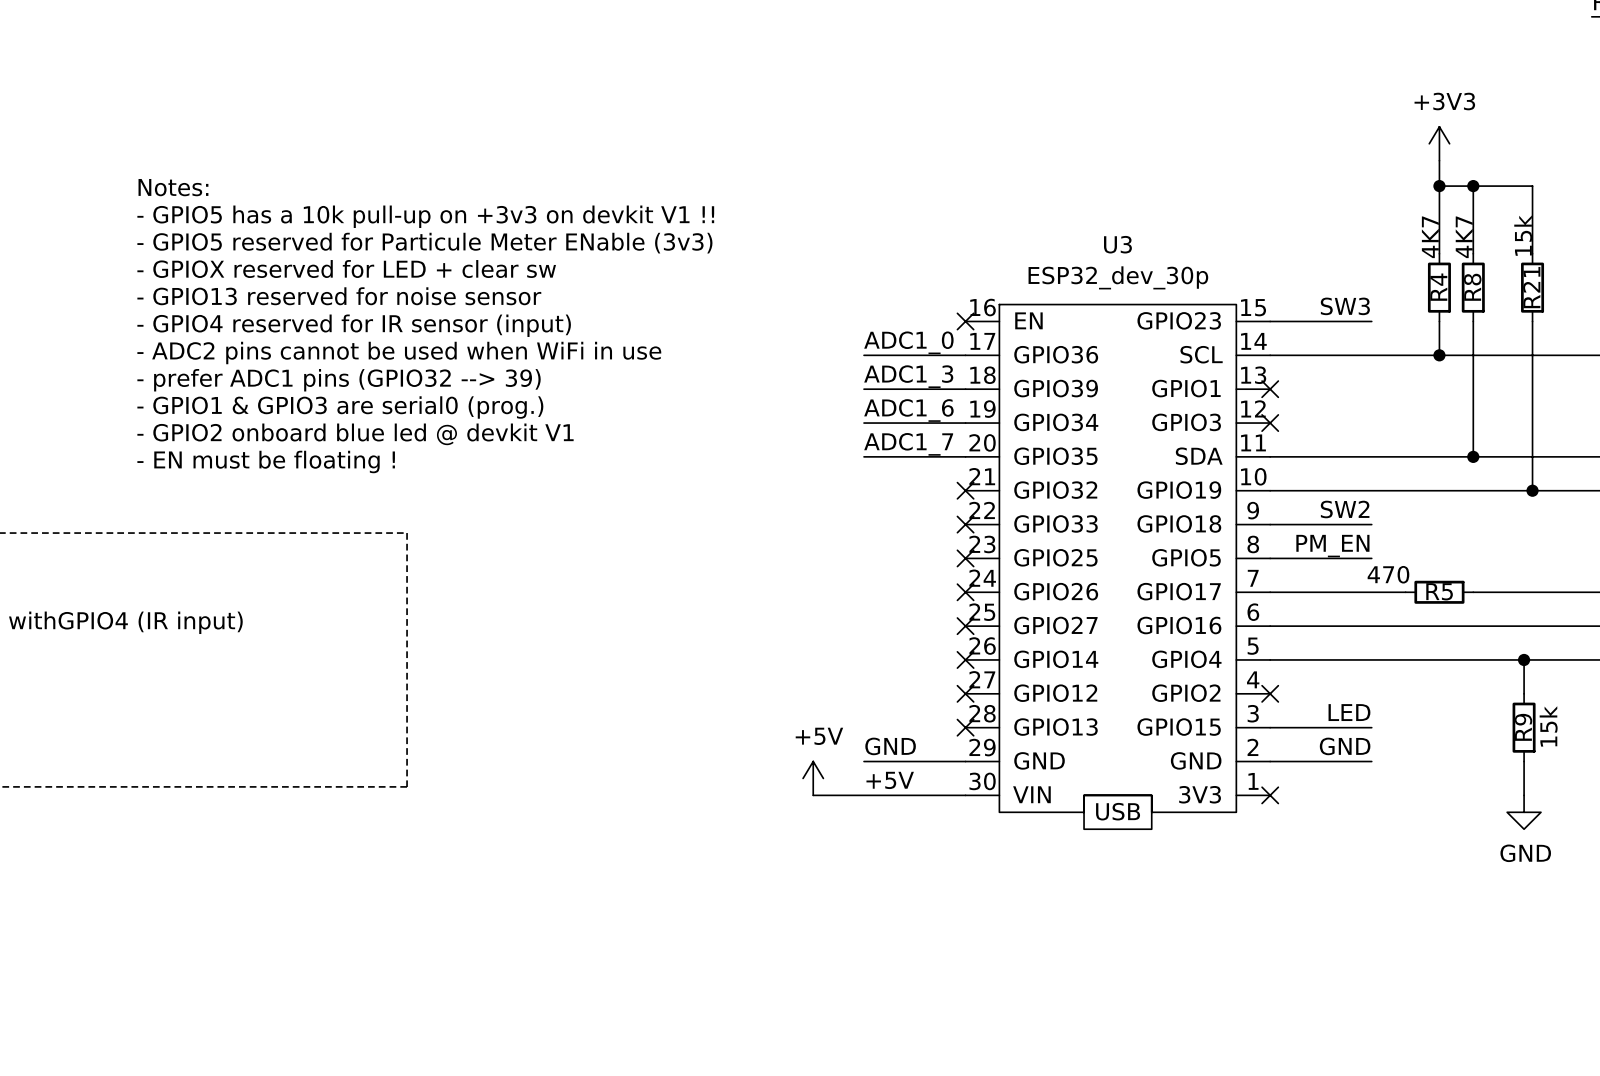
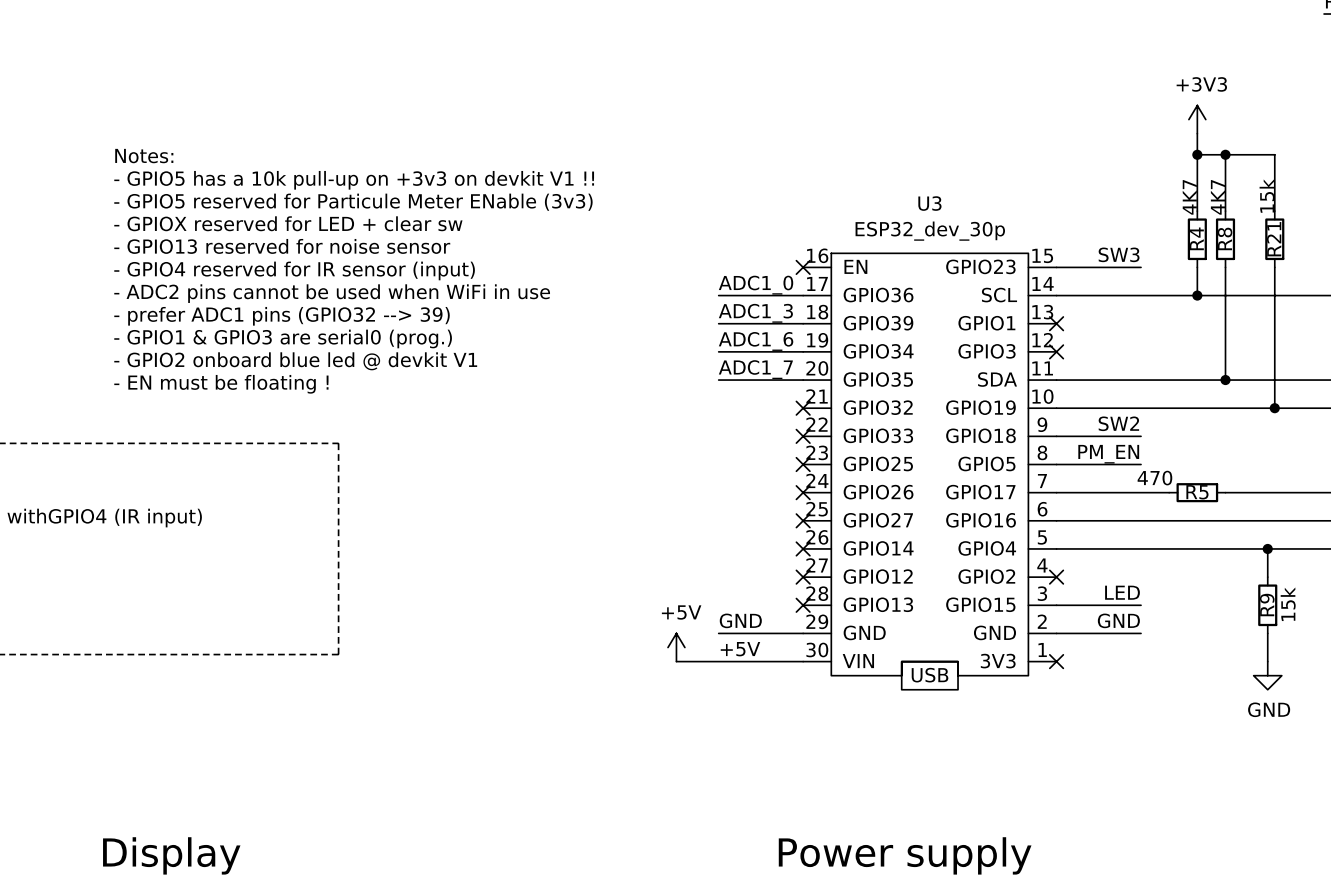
text: none -> Display (171, 855)
text: none -> Power supply (905, 855)

